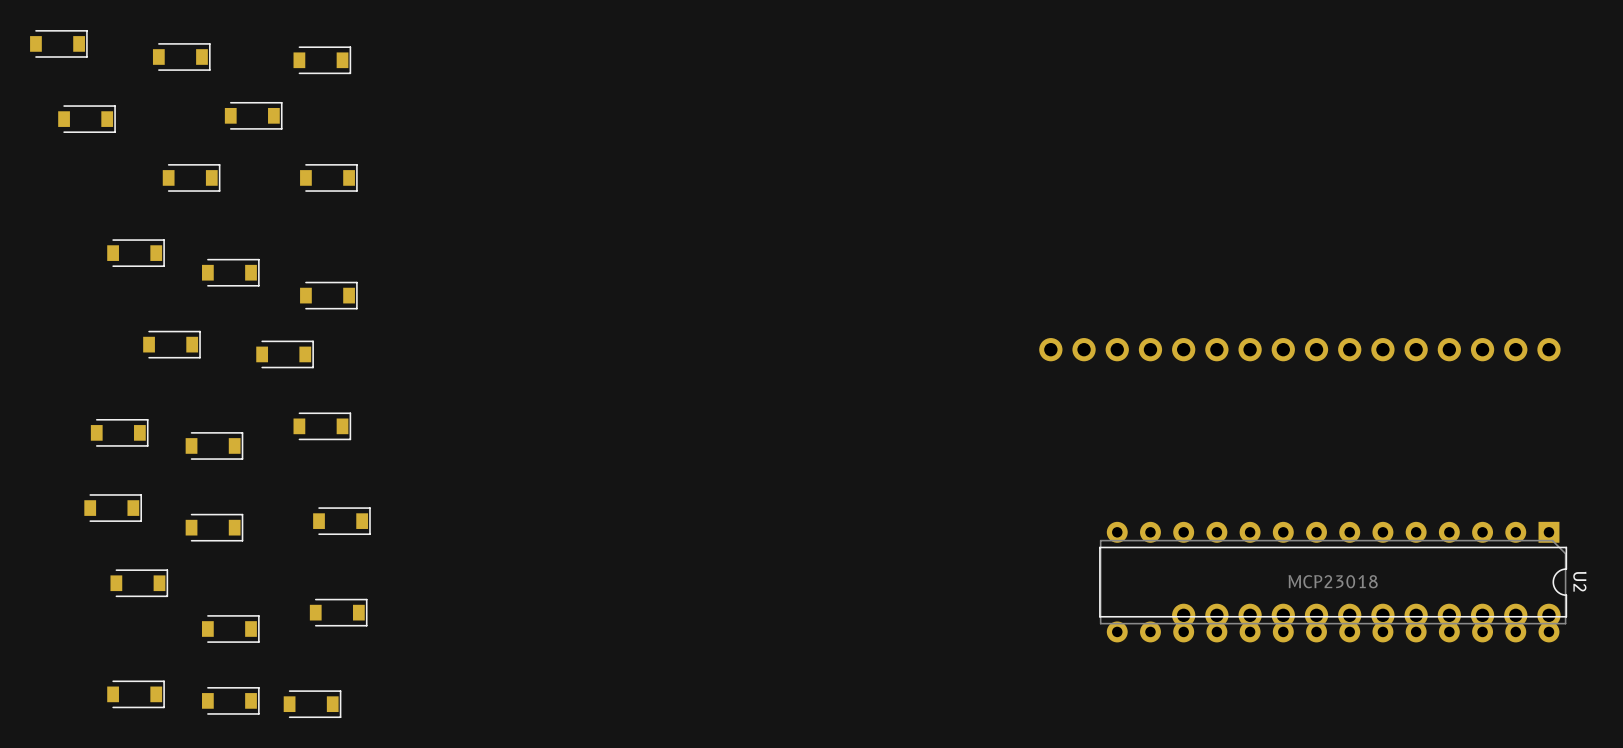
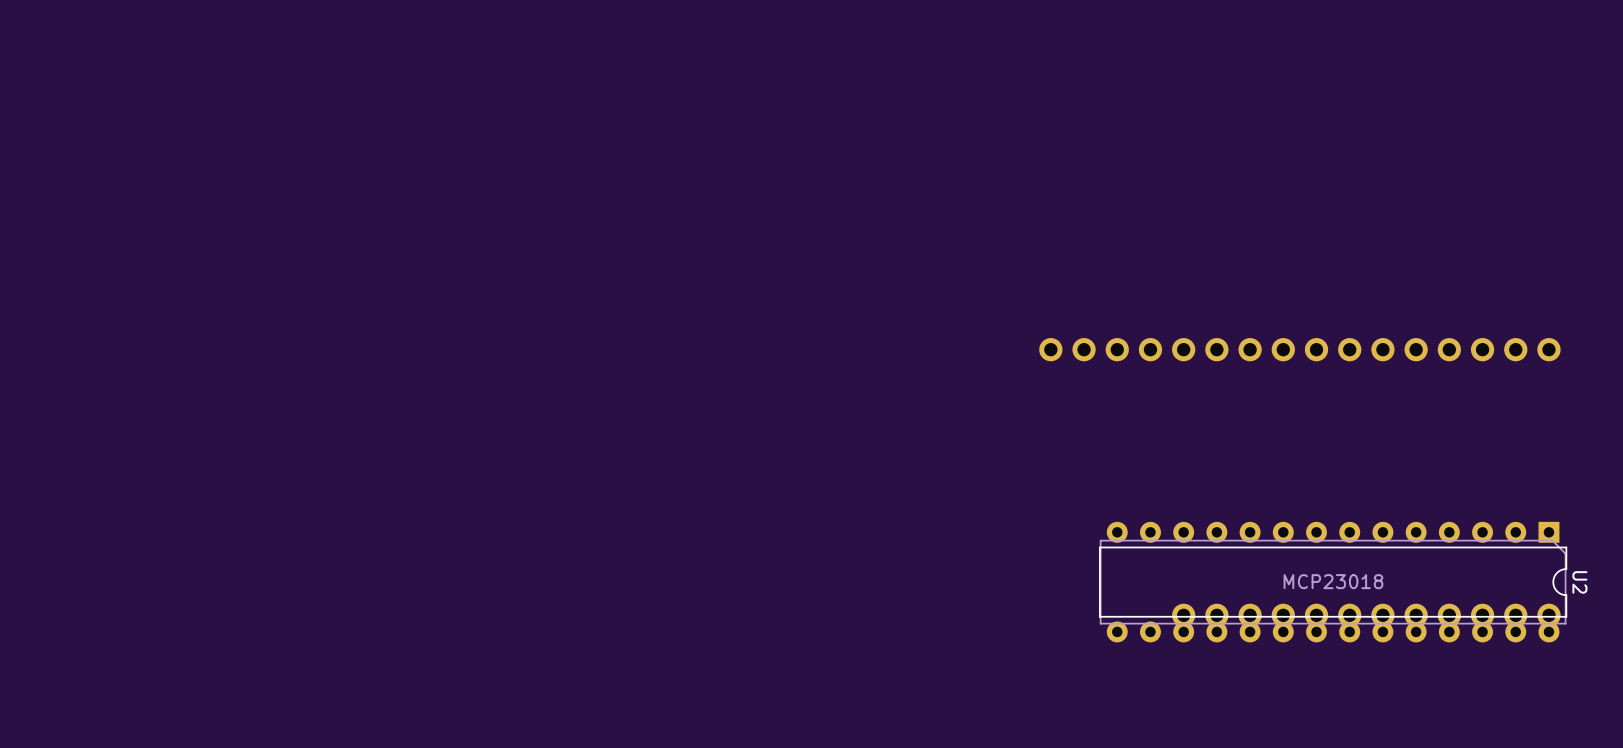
part: (58, 43) -> none
part: (181, 57) -> none
part: (322, 60) -> none
part: (253, 115) -> none
part: (87, 119) -> none
part: (191, 177) -> none
part: (328, 177) -> none
part: (136, 253) -> none
part: (230, 272) -> none
part: (328, 295) -> none
part: (171, 344) -> none
part: (285, 354) -> none
part: (322, 426) -> none
part: (119, 432) -> none
part: (214, 445) -> none
part: (113, 508) -> none
part: (341, 521) -> none
part: (214, 527) -> none
part: (139, 583) -> none
part: (338, 612) -> none
part: (230, 628) -> none
part: (136, 694) -> none
part: (230, 700) -> none
part: (312, 704) -> none

